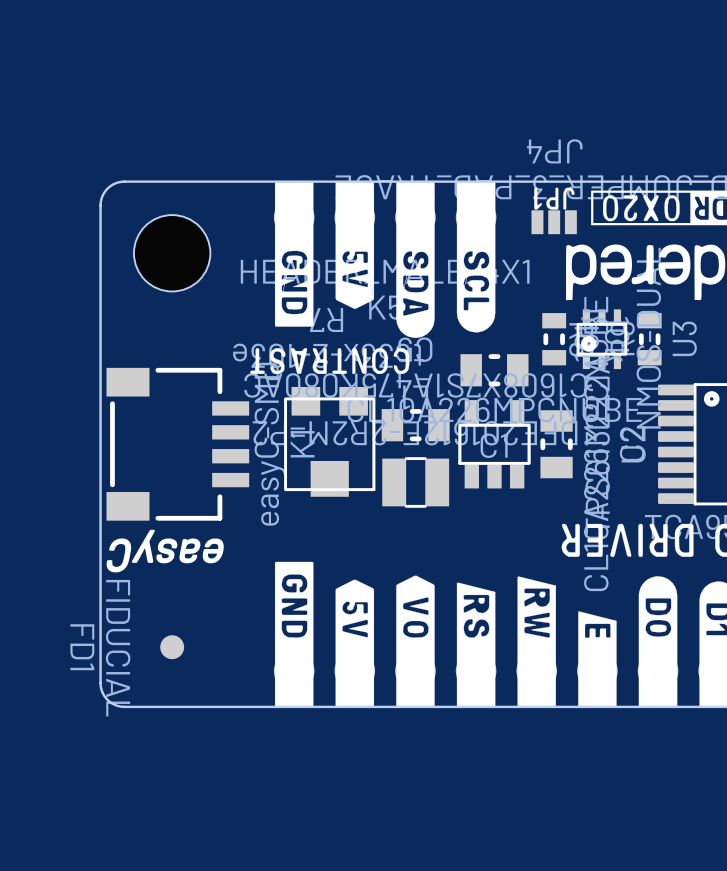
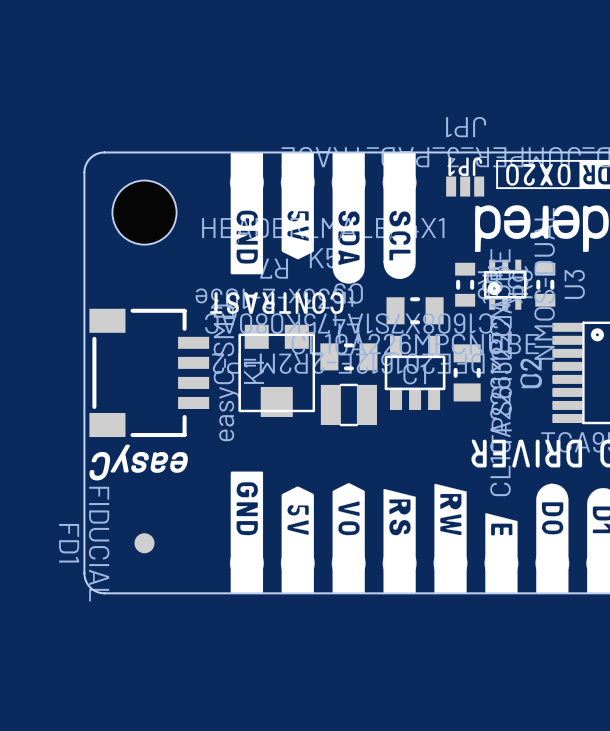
JP4 name: JP4 (554, 151) -> JP1 (466, 127)

